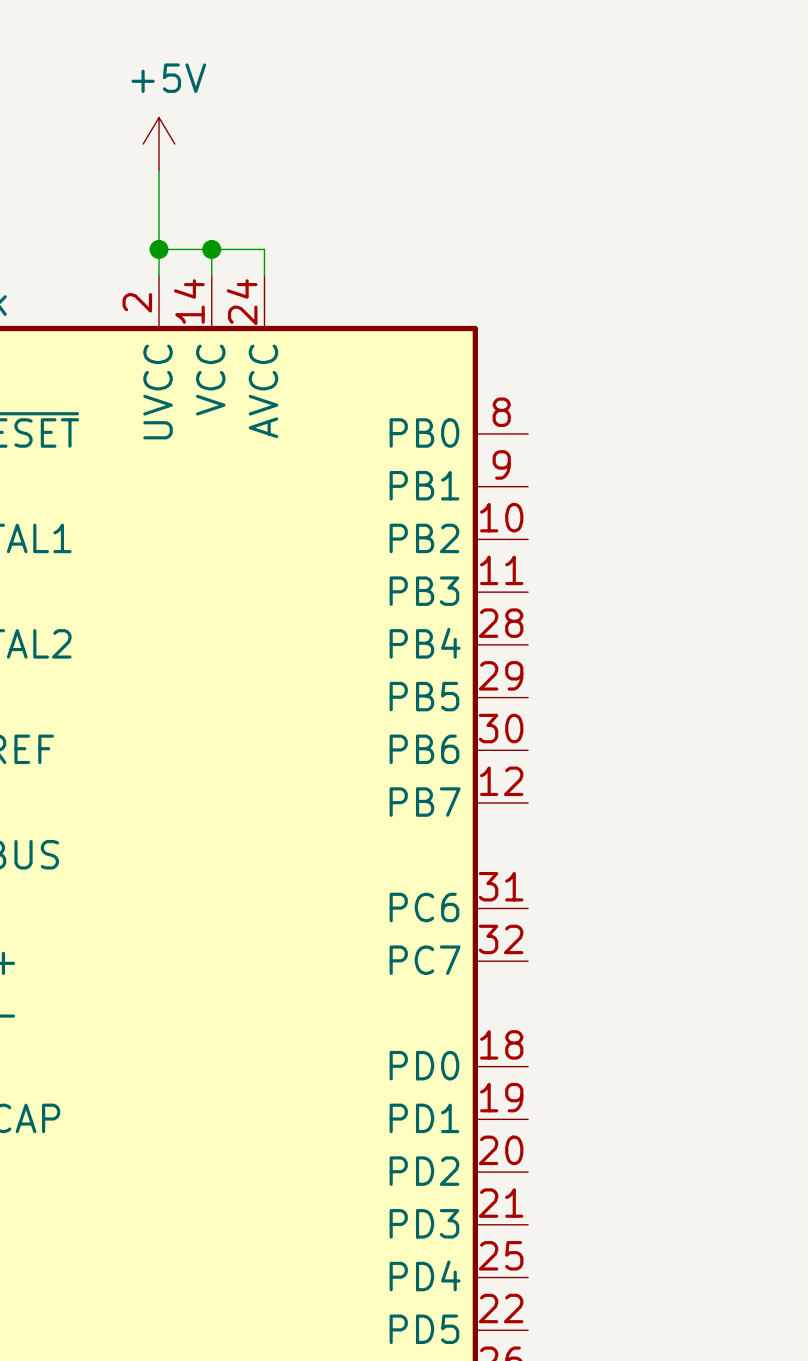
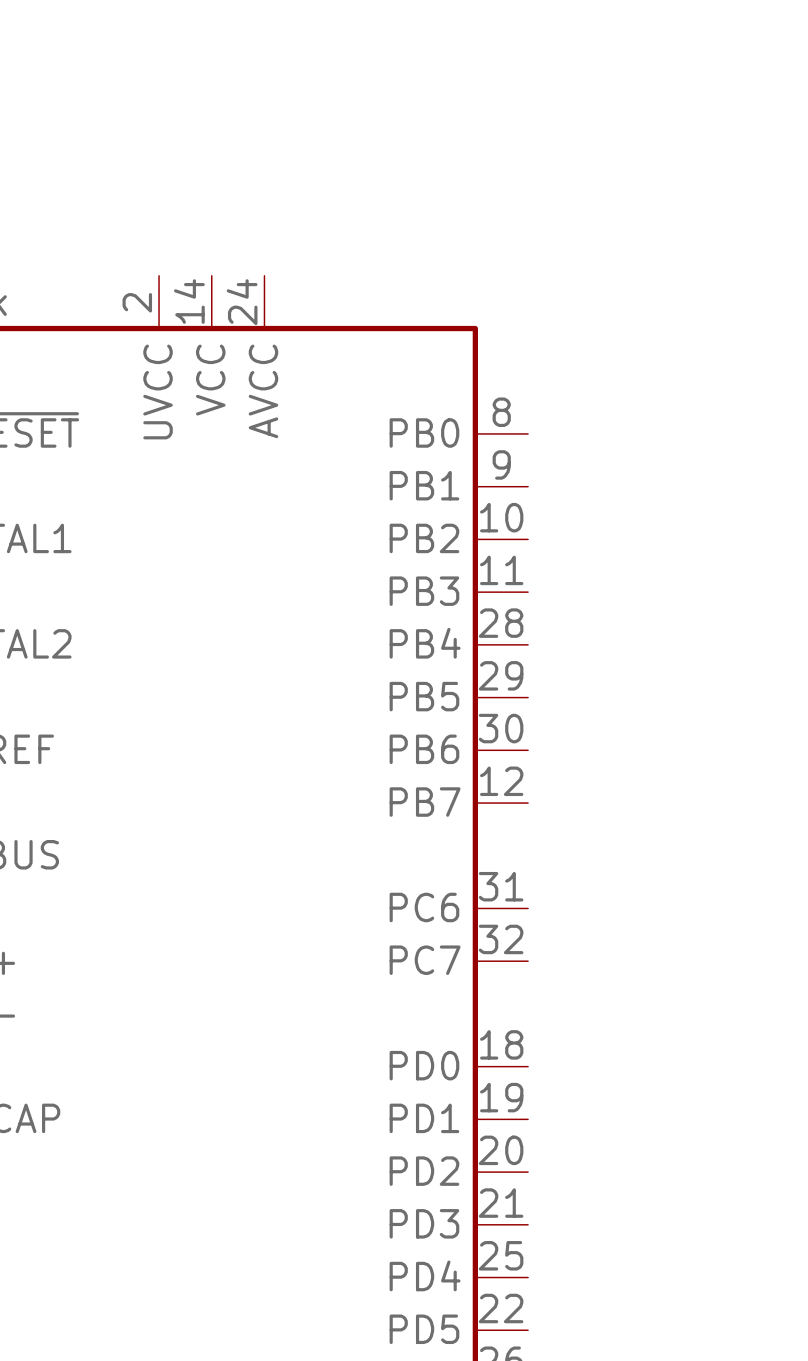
power symbol: +5V (159, 144) -> none
wire: (159, 170) (159, 275) -> none
wire: (159, 249) (264, 249) (264, 275) -> none
junction: (159, 249) -> none
wire: (211, 249) (211, 275) -> none
junction: (211, 249) -> none

